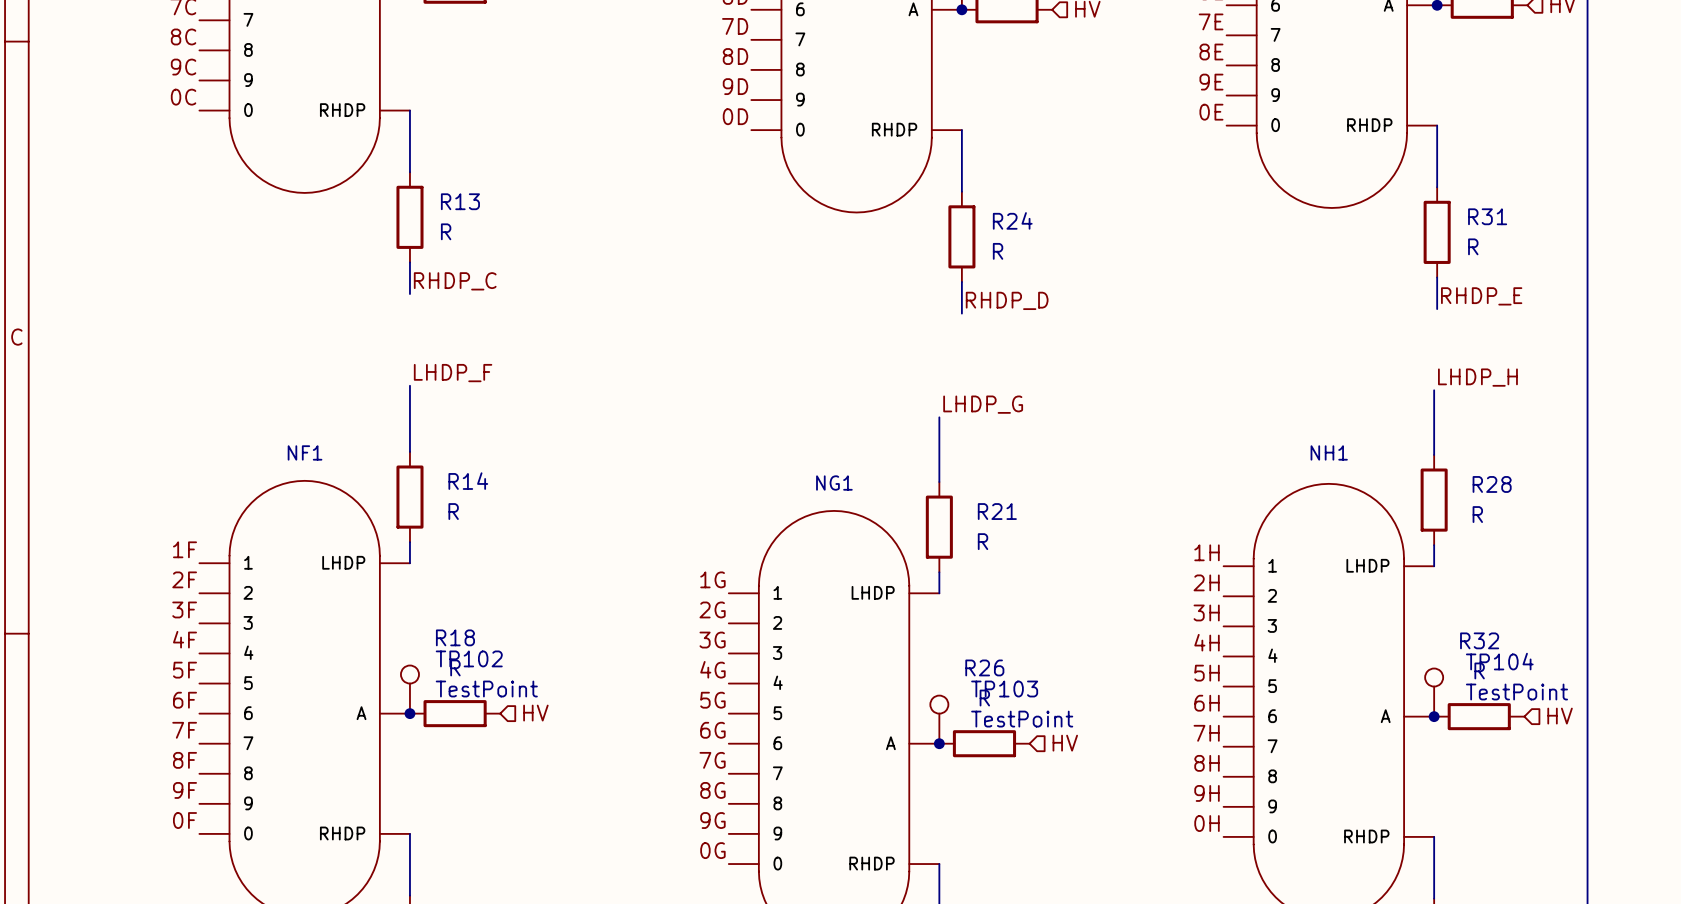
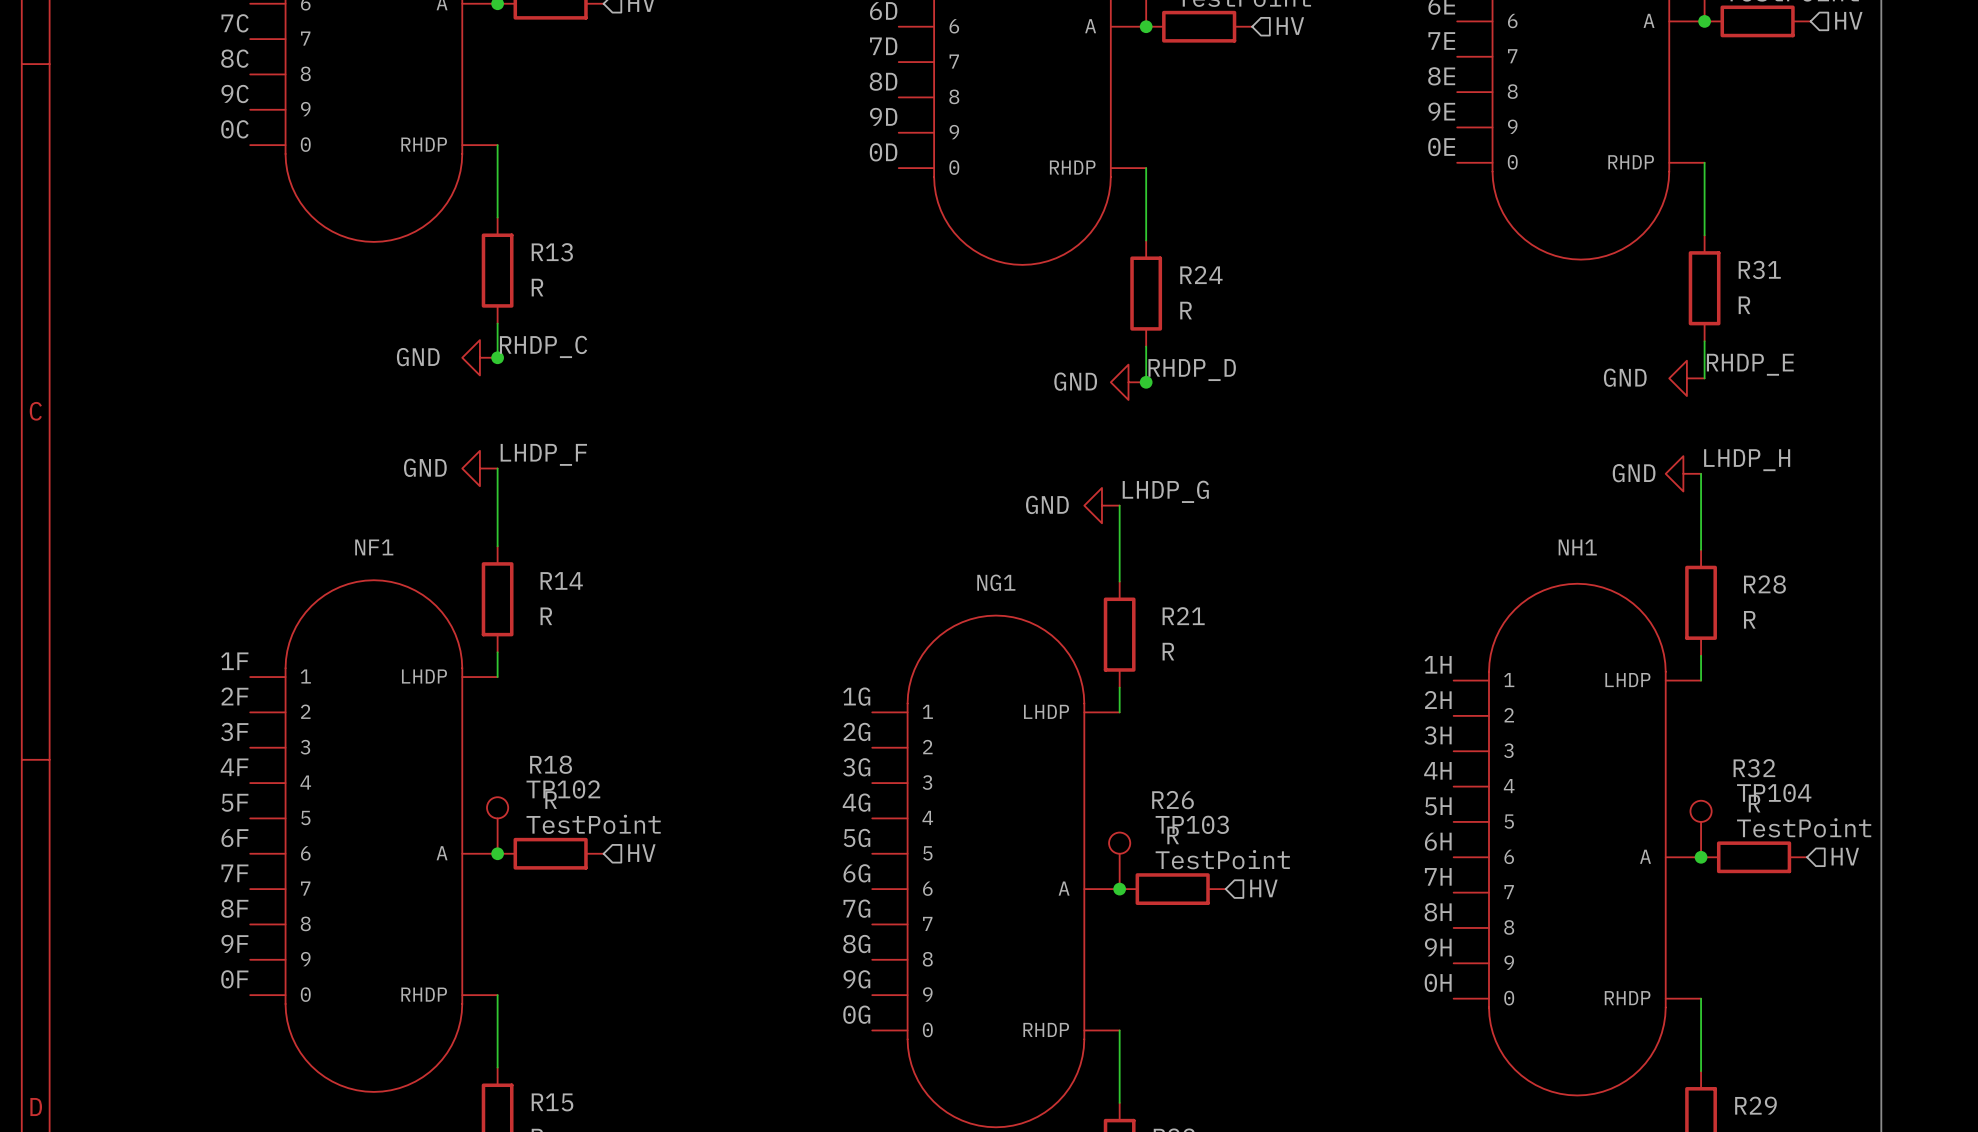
power symbol: none -> GND (479, 357)
junction: none -> (497, 357)
power symbol: none -> GND (1686, 378)
power symbol: none -> GND (1128, 382)
junction: none -> (1146, 382)
power symbol: none -> GND (479, 468)
power symbol: none -> GND (1683, 473)
power symbol: none -> GND (1101, 505)

